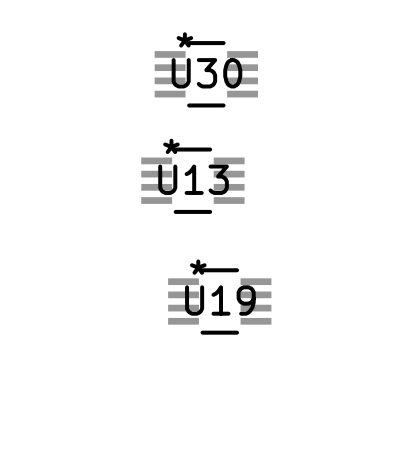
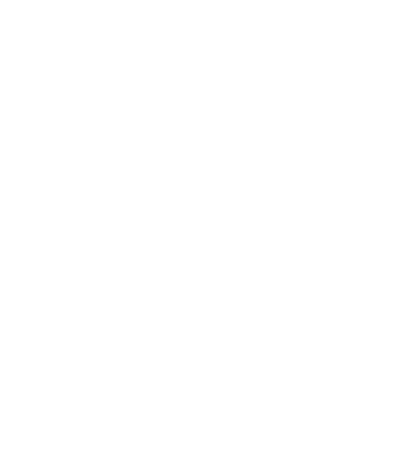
U30: (206, 74) -> none
U13: (192, 180) -> none
U19: (219, 301) -> none

